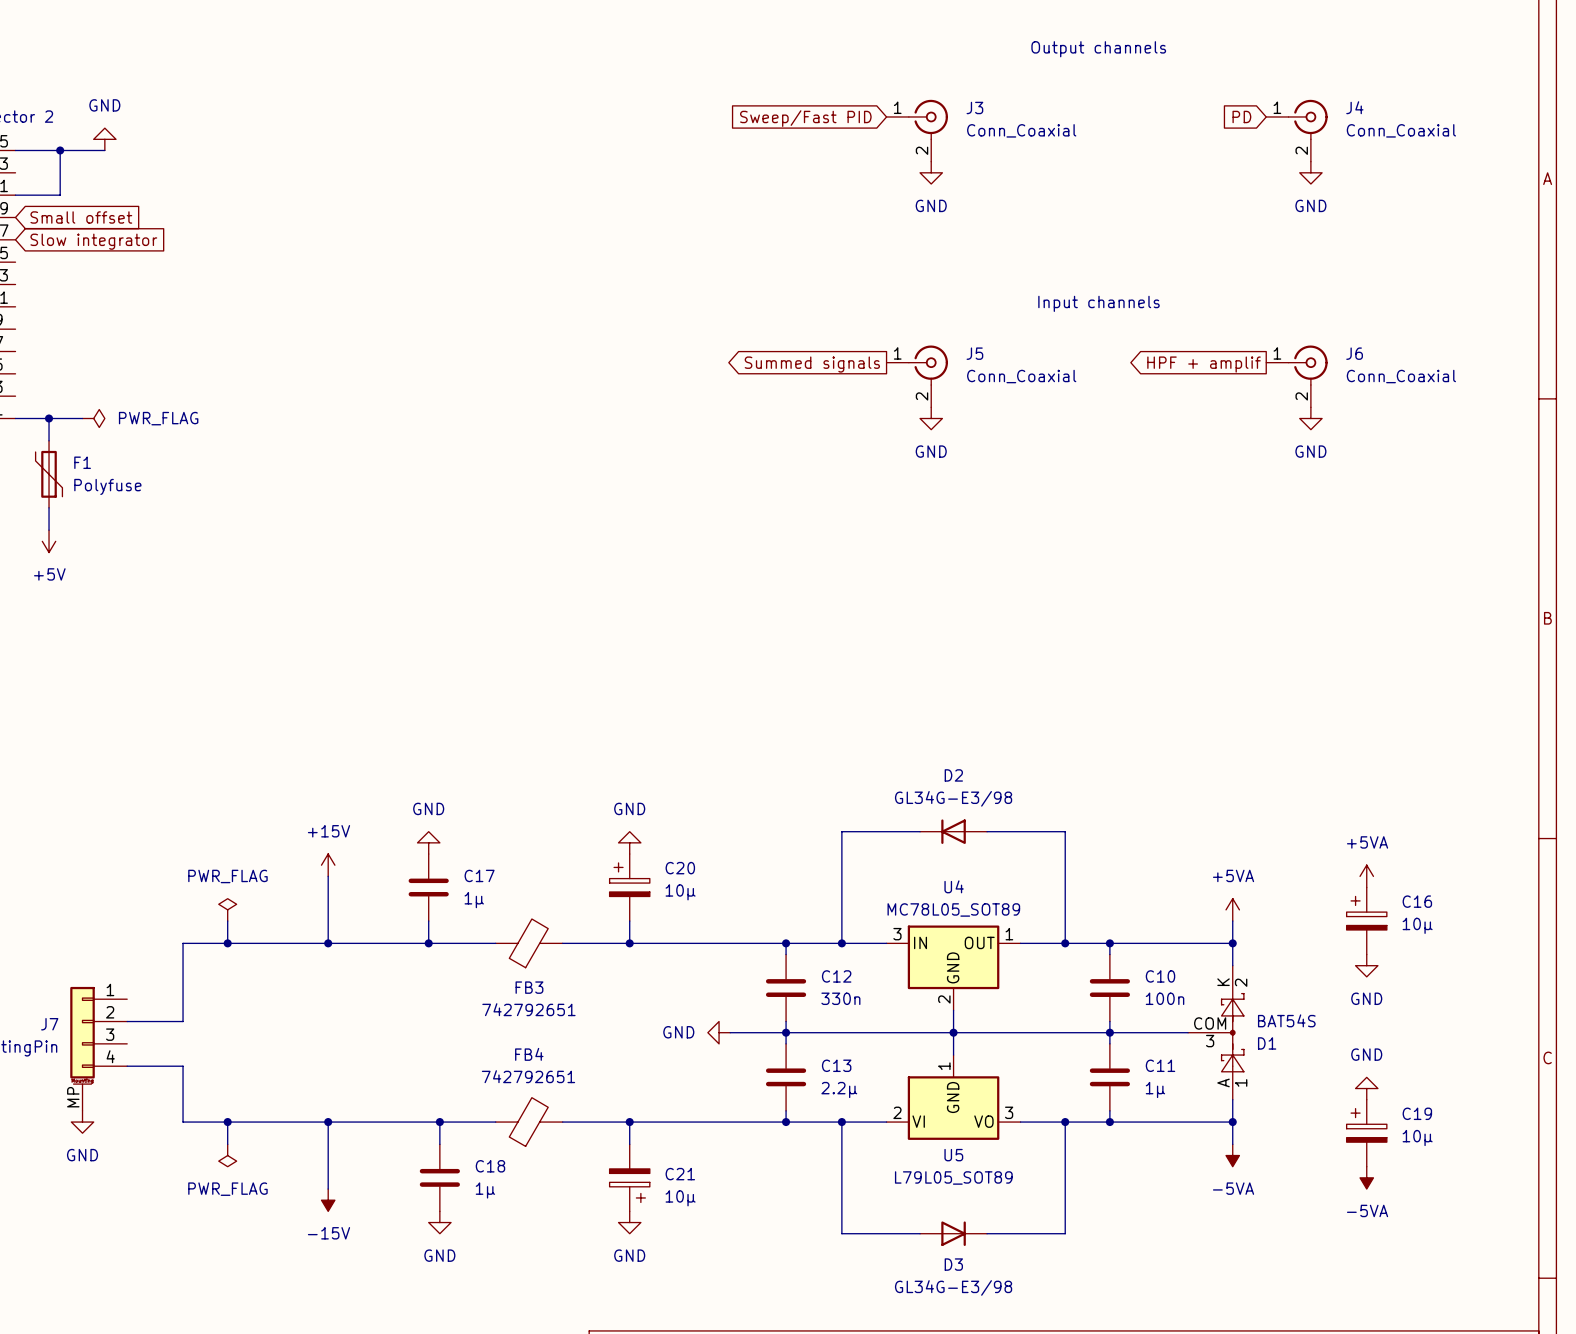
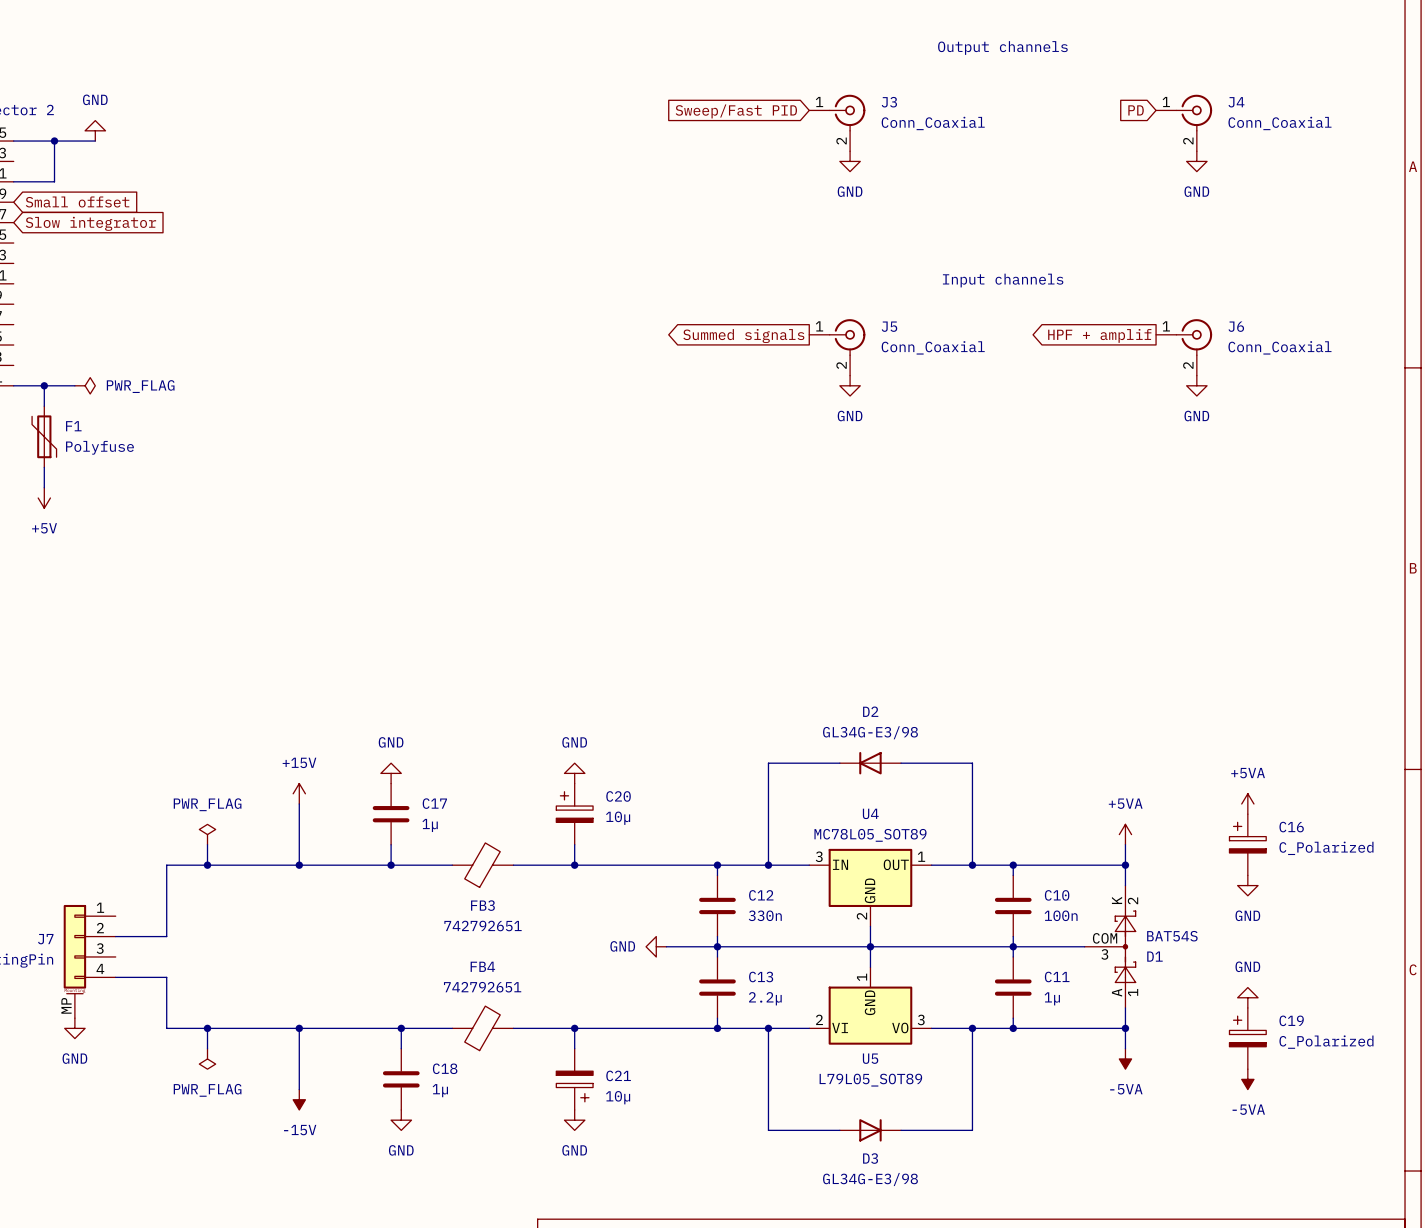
C16 value: 10µ (1417, 925) -> C_Polarized (1326, 848)
C19 value: 10µ (1417, 1138) -> C_Polarized (1326, 1042)

